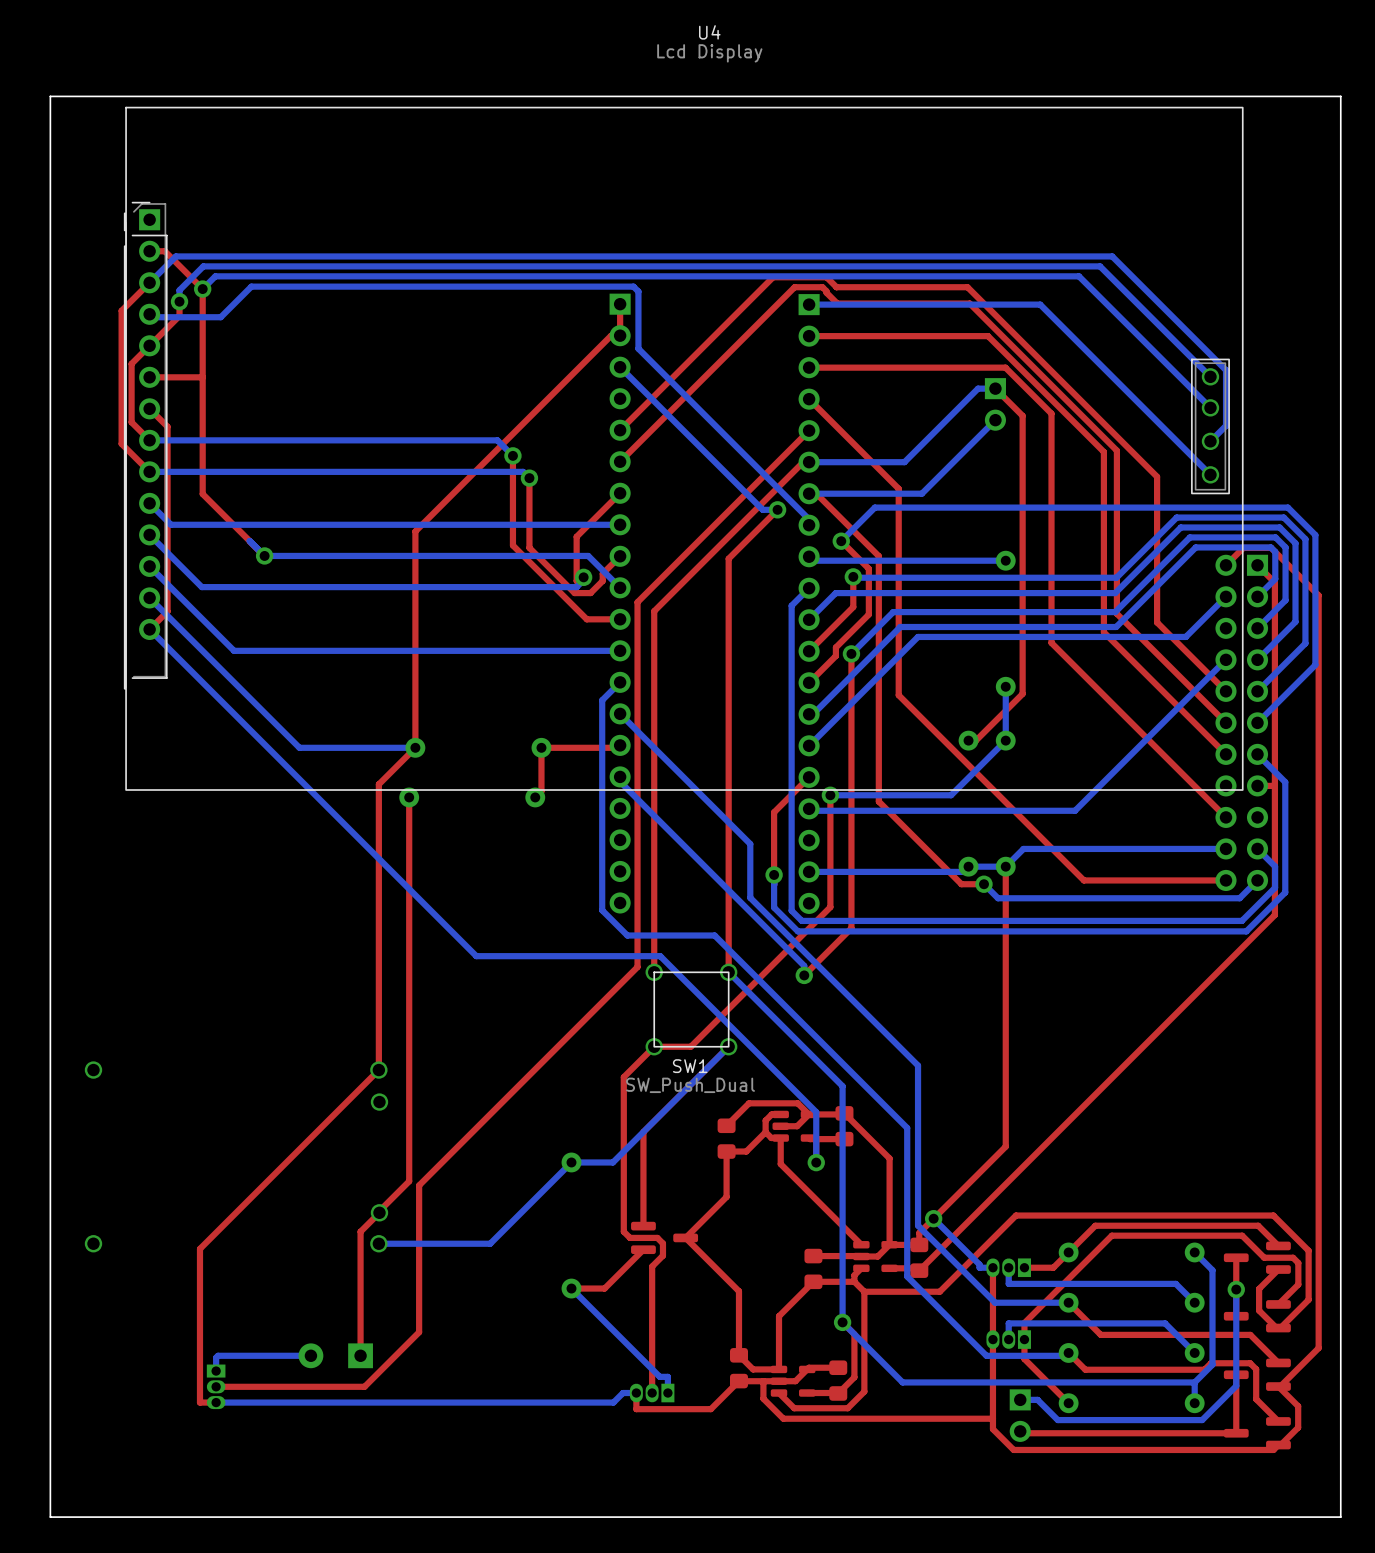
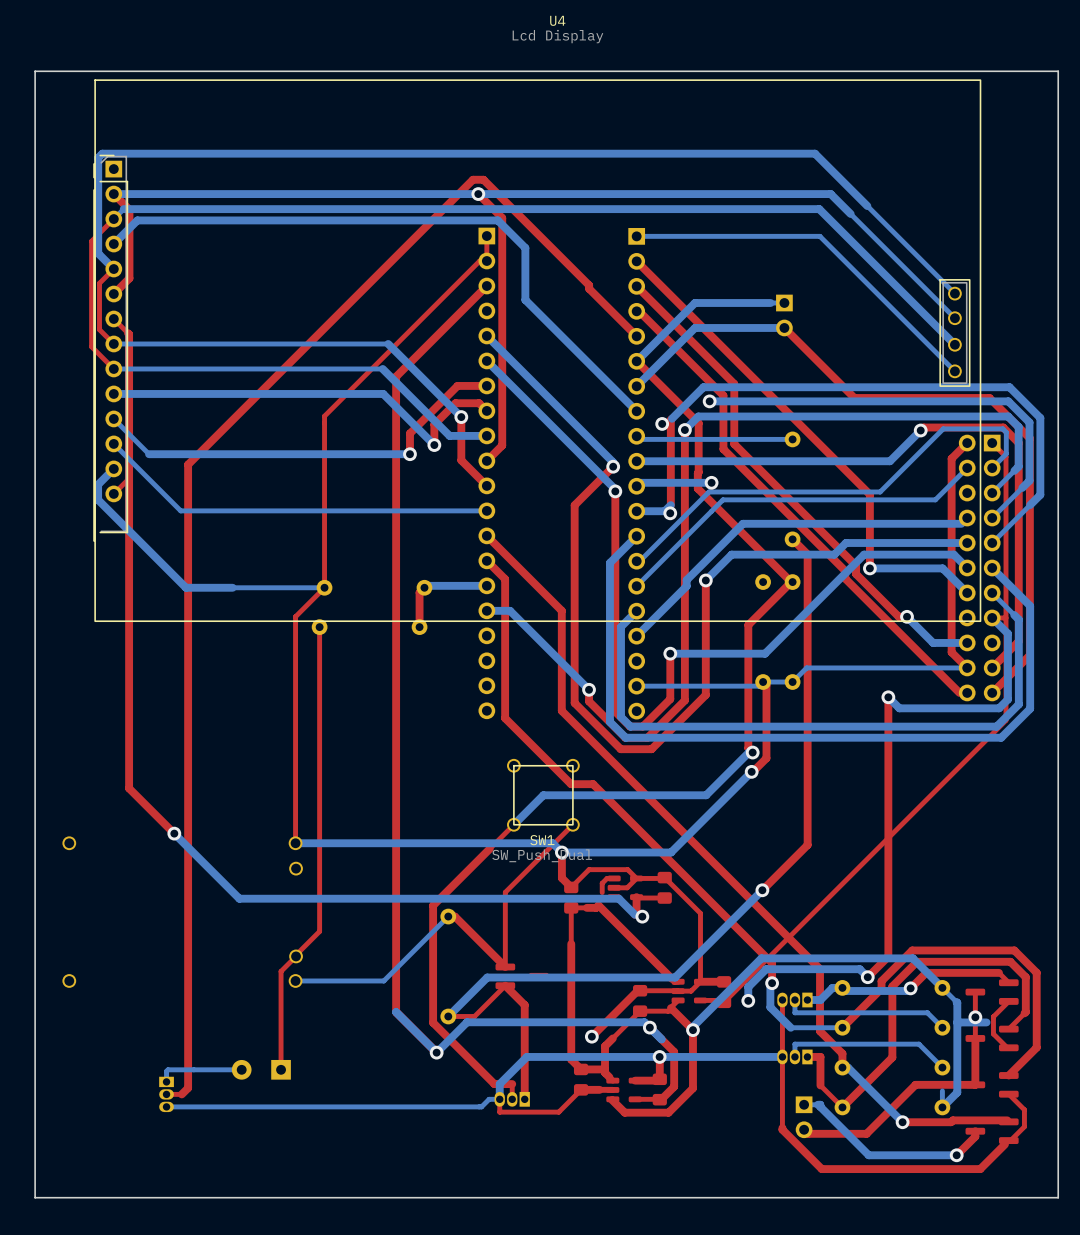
top track: (149, 251) (164, 251) (202, 289) (202, 494) (264, 555) -> none
top track: none -> (478, 194) (502, 217) (502, 445) (486, 460)
via: none -> (478, 194)
bottom track: (1100, 266) (203, 266) (179, 290) (179, 301) -> (867, 206) (814, 153) (102, 153) (98, 157) (98, 253) (113, 269)
bottom track: (162, 270) (175, 256) (1112, 256) (1226, 370) (1226, 425) (1210, 441) -> (123, 209) (819, 209) (954, 344)
bottom track: (1078, 276) (215, 276) (202, 289) -> (850, 213) (830, 194) (113, 194)
via: (202, 289) -> none
top track: (179, 301) (179, 315) (149, 345) -> none
via: (179, 301) -> none
bottom track: (149, 314) (152, 317) (220, 317) (251, 286) (633, 286) (638, 291) (638, 348) (809, 519) (809, 525) -> (113, 244) (137, 220) (497, 220) (525, 247) (525, 299) (636, 411)
top track: (809, 336) (988, 336) (1103, 451) (1103, 632) (1226, 754) -> (636, 261) (869, 494) (869, 568)
top track: none -> (486, 285) (396, 376) (396, 1012) (436, 1052)
bottom track: (620, 367) (762, 509) (777, 509) -> none
top track: (809, 367) (1005, 367) (1051, 413) (1051, 642) (1226, 817) -> (636, 286) (734, 383) (734, 444) (856, 565) (856, 574) (898, 616) (907, 616)
top track: (202, 377) (149, 377) -> (113, 194) (129, 209) (129, 278) (113, 294)
bottom track: (978, 388) (904, 462) (809, 462) -> (770, 302) (694, 302) (636, 361)
top track: (995, 388) (1022, 415) (1022, 693) (975, 740) (968, 740) -> none
top track: (809, 399) (898, 488) (898, 695) (1083, 880) (1216, 880) -> (636, 311) (639, 311) (723, 395) (723, 449) (845, 570) (845, 578) (959, 692)
top track: none -> (784, 327) (854, 397) (989, 397) (1029, 438) (1029, 655) (992, 692)
bottom track: (995, 420) (921, 493) (809, 493) -> (784, 327) (694, 327) (636, 386)
top track: none -> (128, 333) (129, 788) (174, 833)
top track: (620, 430) (773, 277) (826, 277) (836, 287) (967, 287) (1157, 476) (1157, 622) (1226, 691) -> none
bottom track: none -> (486, 335) (613, 462) (613, 466)
top track: (809, 430) (637, 602) (637, 967) (419, 1185) (419, 1332) (364, 1386) (235, 1386) -> (636, 336) (589, 288) (589, 285) (483, 179) (472, 179) (188, 464) (188, 1088) (181, 1094)
bottom track: (495, 440) (512, 455) -> (388, 343) (461, 417)
top track: (512, 455) (512, 545) (586, 619) (620, 619) -> (461, 417) (461, 460) (486, 485)
via: (512, 455) -> none
top track: (620, 461) (794, 287) (822, 287) (837, 303) (969, 303) (1116, 450) (1116, 613) (1226, 722) -> none
bottom track: none -> (486, 360) (615, 491)
top track: (809, 462) (803, 462) (654, 611) (654, 972) -> (636, 361) (698, 423) (697, 488) (791, 582)
bottom track: (488, 471) (523, 471) (529, 478) -> (382, 368) (449, 435) (486, 435)
top track: (529, 478) (529, 547) (574, 593) (590, 593) (602, 580) (602, 573) (620, 556) -> none
via: (529, 478) -> none
top track: (620, 493) (576, 536) (576, 581) (580, 582) (583, 577) -> (486, 385) (457, 385) (409, 433) (409, 454)
top track: (809, 493) (816, 493) (878, 556) (878, 801) (961, 884) (983, 884) -> none
bottom track: (149, 503) (171, 524) (620, 524) -> (113, 393) (383, 393) (434, 445)
top track: (777, 509) (728, 558) (728, 972) -> none
via: (777, 509) -> none
via: none -> (709, 401)
top track: none -> (486, 410) (479, 403) (455, 403) (434, 424) (434, 445)
via: none -> (461, 417)
top track: none -> (671, 418) (670, 505)
bottom track: (249, 541) (264, 555) (588, 555) (620, 587) -> none
top track: (841, 541) (868, 568) (868, 614) (835, 647) (835, 655) (809, 682) -> none
bottom track: (844, 544) (841, 541) (874, 507) (1287, 507) (1315, 535) (1315, 664) (1257, 722) -> (636, 536) (609, 562) (609, 721) (625, 737) (1001, 737) (1030, 708) (1030, 605) (992, 567)
top track: none -> (684, 430) (684, 700) (647, 737) (625, 737) (589, 701) (589, 689)
via: none -> (684, 430)
top track: none -> (920, 430) (923, 427) (1003, 427) (1018, 443) (1018, 641) (992, 667)
via: none -> (920, 430)
via: (264, 555) -> none
top track: (1226, 565) (1243, 547) (1271, 547) (1318, 595) (1318, 1348) (1279, 1387) -> (967, 443) (951, 458) (951, 652) (967, 667)
via: none -> (434, 445)
top track: (853, 576) (853, 607) (809, 651) -> none
bottom track: (853, 576) (1116, 577) (1176, 517) (1283, 517) (1305, 539) (1305, 643) -> (671, 418) (703, 387) (1009, 387) (1040, 418) (1040, 494) (1030, 505)
via: (853, 576) -> none
bottom track: (583, 577) (583, 580) (576, 587) (201, 587) (194, 579) -> (409, 454) (149, 454)
via: (583, 577) -> none
via: none -> (409, 454)
bottom track: (809, 588) (791, 605) (791, 910) (801, 920) (1241, 920) (1275, 887) (1275, 866) (1257, 848) -> (636, 461) (889, 461) (920, 430)
top track: none -> (613, 466) (574, 505) (574, 703) (620, 749) (651, 749) (705, 695) (705, 580)
via: none -> (613, 466)
bottom track: (149, 597) (299, 747) -> (113, 468) (98, 484) (98, 499) (185, 587) (232, 587)
bottom track: (1285, 600) (1285, 547) (1275, 537) (1189, 537) (1115, 612) (893, 612) (851, 653) -> (1014, 470) (1018, 466) (1018, 427) (1008, 416) (698, 416) (684, 430)
bottom track: (813, 615) (835, 593) (1115, 593) (1180, 527) (1279, 527) (1295, 543) (1295, 621) -> (709, 401) (1008, 401) (1029, 422) (1029, 480) (1022, 487)
bottom track: none -> (711, 482) (640, 482)
via: none -> (711, 482)
top track: none -> (615, 491) (615, 711) (630, 726) (642, 726) (670, 699) (670, 653)
via: none -> (615, 491)
bottom track: (149, 629) (476, 956) (660, 956) (816, 1112) (816, 1162) -> none
bottom track: none -> (670, 505) (664, 511) (636, 511)
top track: (851, 653) (851, 928) (804, 974) -> none
bottom track: (1218, 667) (1075, 810) (811, 810) (809, 808) -> (961, 523) (742, 523) (686, 580) (686, 586) (636, 636)
top track: none -> (486, 535) (561, 610) (561, 710) (820, 969) (820, 1031) (842, 1053) (842, 1067)
bottom track: (620, 682) (602, 700) (602, 910) (627, 935) (714, 935) (907, 1128) (907, 1276) (986, 1355) (1065, 1355) (1068, 1352) -> (902, 1122) (847, 1067) (842, 1067)
top track: none -> (792, 539) (807, 554) (807, 845) (762, 890)
bottom track: (1005, 686) (1005, 740) (951, 795) (830, 795) -> none
bottom track: none -> (967, 543) (845, 543) (834, 554) (731, 554) (705, 580)
top track: none -> (486, 560) (505, 579) (505, 718) (571, 784) (593, 784) (772, 963) (772, 983)
bottom track: (620, 713) (750, 844) (750, 897) (918, 1065) (918, 1225) (995, 1302) (1003, 1302) -> (772, 983) (770, 984) (770, 1007) (790, 1027)
bottom track: none -> (967, 567) (953, 554) (864, 554) (765, 653) (670, 653)
bottom track: none -> (869, 568) (942, 568) (967, 592)
via: none -> (869, 568)
via: none -> (705, 580)
top track: none -> (791, 582) (748, 625) (748, 748) (752, 752)
top track: (620, 745) (617, 747) (541, 747) (541, 791) (535, 797) -> (424, 587) (419, 592) (419, 627)
bottom track: none -> (486, 585) (426, 585) (424, 587)
bottom track: (620, 776) (620, 781) (804, 965) (804, 975) -> (486, 610) (510, 610) (589, 689)
top track: (809, 777) (774, 812) (774, 885) -> none
bottom track: (1285, 782) (1285, 892) (1246, 931) (797, 931) (774, 907) (774, 874) -> (1014, 614) (1018, 619) (1018, 704) (996, 726) (630, 726) (621, 717) (621, 626) (636, 611)
bottom track: none -> (907, 616) (933, 642) (967, 642)
via: none -> (907, 616)
bottom track: none -> (992, 617) (1007, 633) (1007, 699) (999, 708) (899, 708) (888, 697)
top track: (830, 795) (830, 907) (690, 1046) (654, 1046) -> none
via position: (830, 795) -> (670, 653)
top track: none -> (763, 682) (766, 685) (766, 758) (751, 771)
top track: (1005, 866) (1005, 1146) (919, 1233) (919, 1244) (889, 1244) -> (723, 981) (700, 981)
via position: (774, 874) -> (589, 689)
bottom track: (1257, 880) (1239, 898) (998, 898) (983, 884) -> none
via: (983, 884) -> none
top track: none -> (888, 697) (888, 956) (867, 977)
via: none -> (888, 697)
bottom track: none -> (752, 752) (748, 752) (706, 795) (543, 795) (513, 824)
via: none -> (752, 752)
bottom track: (728, 972) (842, 1086) (842, 1322) (902, 1382) (1194, 1382) (1212, 1364) (1212, 1270) -> (942, 1107) (957, 1092) (956, 1002)
via: (804, 975) -> none
bottom track: none -> (751, 771) (671, 852) (561, 852) (552, 843) (295, 843)
via: none -> (751, 771)
bottom track: (728, 1046) (612, 1162) (571, 1162) -> none
bottom track: none -> (174, 833) (239, 898) (618, 898) (634, 914)
via: none -> (174, 833)
top track: (378, 1070) (199, 1248) (199, 1402) (216, 1402) -> none
top track: (623, 1077) (623, 1231) (629, 1237) (657, 1237) (662, 1243) (662, 1255) (652, 1266) (652, 1373) -> (489, 848) (433, 905) (433, 1022) (494, 1084) (512, 1084)
top track: none -> (561, 852) (561, 878) (571, 887)
via: none -> (561, 852)
via: none -> (762, 890)
top track: none -> (636, 897) (634, 914)
top track: (746, 1151) (765, 1132) (771, 1138) (780, 1138) (780, 1164) (861, 1244) -> (586, 907) (596, 907) (598, 905) (674, 981) (678, 981)
top track: none -> (448, 916) (454, 916) (505, 967)
top track: (726, 1196) (685, 1237) (739, 1291) (739, 1355) (753, 1369) (779, 1369) (779, 1316) -> (571, 943) (571, 1059) (581, 1069) (605, 1069)
bottom track: (933, 1218) (979, 1264) (979, 1267) (992, 1267) -> none
via: (933, 1218) -> none
top track: (1266, 1233) (1258, 1225) (1095, 1225) (1053, 1267) (1024, 1267) -> (998, 972) (926, 972) (910, 988)
bottom track: none -> (867, 977) (859, 969) (766, 969) (748, 987) (748, 1000)
via: none -> (867, 977)
via: none -> (772, 983)
top track: none -> (505, 985) (524, 1005) (524, 1099)
bottom track: none -> (942, 987) (912, 958) (761, 958) (692, 1026) (692, 1030)
bottom track: none -> (910, 988) (908, 990) (845, 990) (842, 987) (832, 987) (820, 999) (807, 999)
via: none -> (910, 988)
top track: none -> (640, 990) (637, 990) (591, 1036) (591, 1039)
via: none -> (748, 1000)
bottom track: none -> (396, 1012) (436, 1052) (467, 1022) (644, 1022) (661, 1039)
top track: (1298, 1284) (1298, 1263) (1293, 1257) (1264, 1257) (1242, 1235) (1111, 1235) (1024, 1323) (1024, 1359) (1040, 1375) -> (1024, 1013) (1025, 977) (1010, 961) (917, 961) (892, 986) (892, 1057) (842, 1107)
bottom track: (571, 1288) (659, 1376) (667, 1376) (667, 1393) -> (448, 1016) (487, 977) (675, 977) (762, 890)
bottom track: (1236, 1289) (1236, 1386) (1202, 1420) (1057, 1420) (1037, 1399) -> (956, 1155) (868, 1155) (820, 1104) (817, 1104)
bottom track: none -> (986, 1022) (957, 1022)
via: none -> (649, 1027)
top track: (1068, 1302) (1100, 1334) (1250, 1334) (1278, 1362) -> (842, 1027) (881, 988) (881, 981) (912, 950) (1014, 950) (1036, 972) (1036, 1047) (1008, 1075)
via: none -> (692, 1030)
via: none -> (591, 1036)
top track: none -> (612, 1038) (605, 1046) (605, 1072) (612, 1080)
top track: (842, 1322) (854, 1334) (854, 1377) (837, 1393) -> (649, 1027) (674, 1051) (674, 1086) (659, 1099)
via: (842, 1322) -> none
top track: (1278, 1328) (1308, 1299) (1308, 1250) (1273, 1215) (1015, 1215) (939, 1291) (864, 1291) (864, 1391) (847, 1408) (794, 1408) (779, 1393) -> (670, 1008) (692, 1030) (692, 1088) (668, 1112) (624, 1112) (612, 1099)
via: none -> (436, 1052)
top track: none -> (659, 1056) (658, 1080) (635, 1080)
via: none -> (659, 1056)
bottom track: none -> (782, 1056) (526, 1056) (499, 1084) (499, 1099)
top track: none -> (807, 1056) (820, 1056) (820, 1085)
top track: (1068, 1352) (1085, 1369) (1204, 1369) (1210, 1363) (1250, 1363) (1256, 1369) (1256, 1399) (1276, 1419) -> (902, 1122) (1007, 1120)
top track: (838, 1367) (808, 1367) (795, 1381) (739, 1381) -> (612, 1089) (581, 1089)
top track: (1236, 1374) (1236, 1433) (1022, 1433) -> (975, 1038) (975, 1084) (915, 1084) (866, 1133) (808, 1133) (805, 1131)
top track: (763, 1381) (763, 1398) (783, 1418) (992, 1418) -> none
via: none -> (902, 1122)
top track: (992, 1429) (1013, 1449) (1273, 1449) -> (782, 1128) (821, 1169) (980, 1169) (1004, 1144)
top track: none -> (975, 1131) (975, 1136) (956, 1155)
via: none -> (956, 1155)

